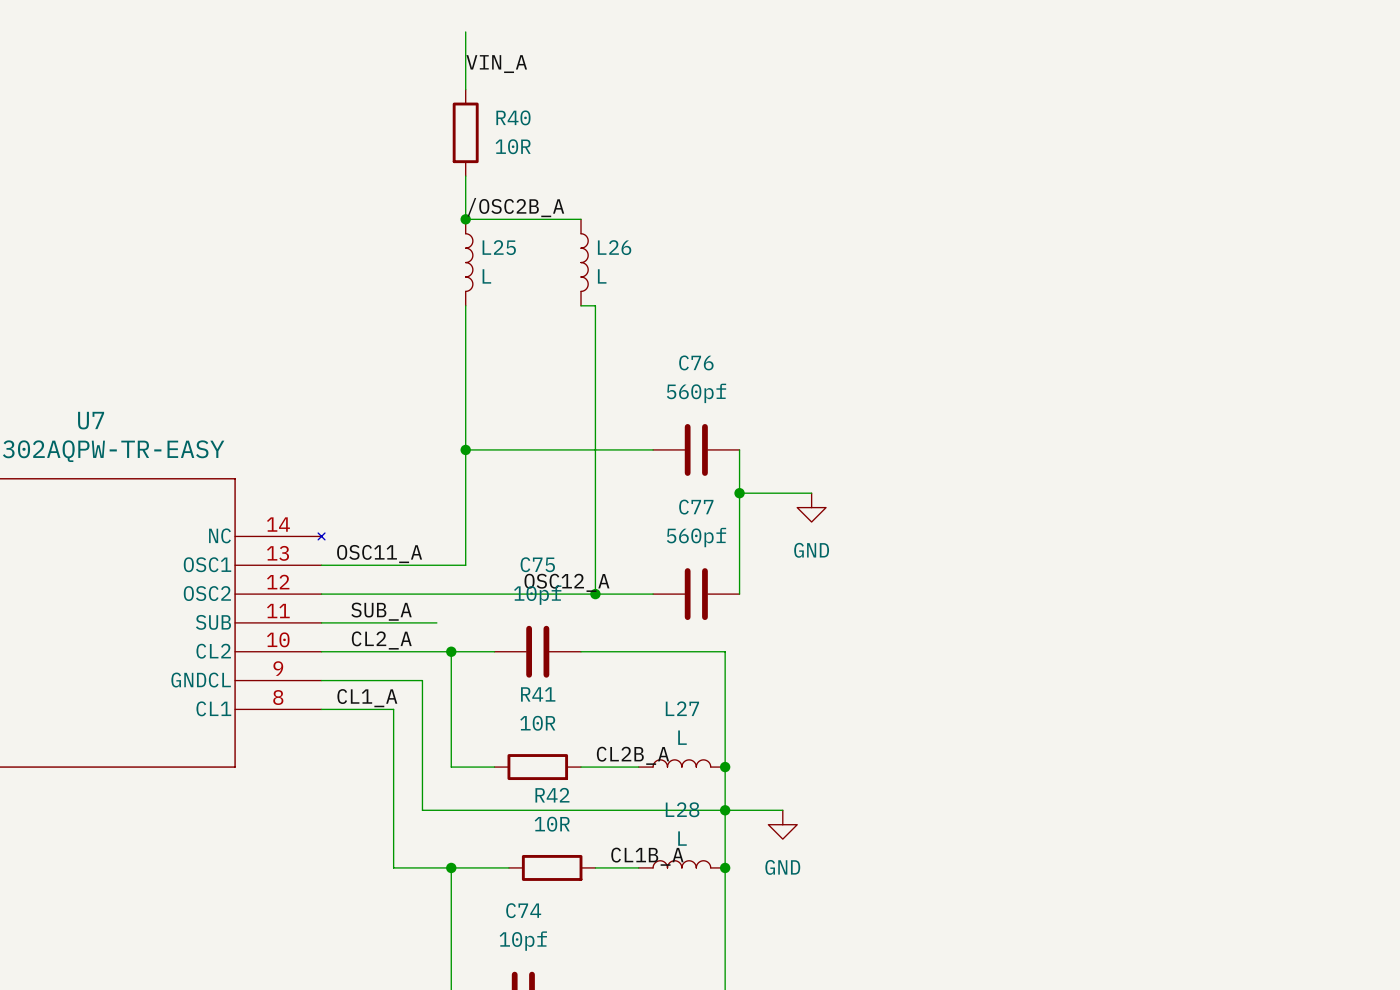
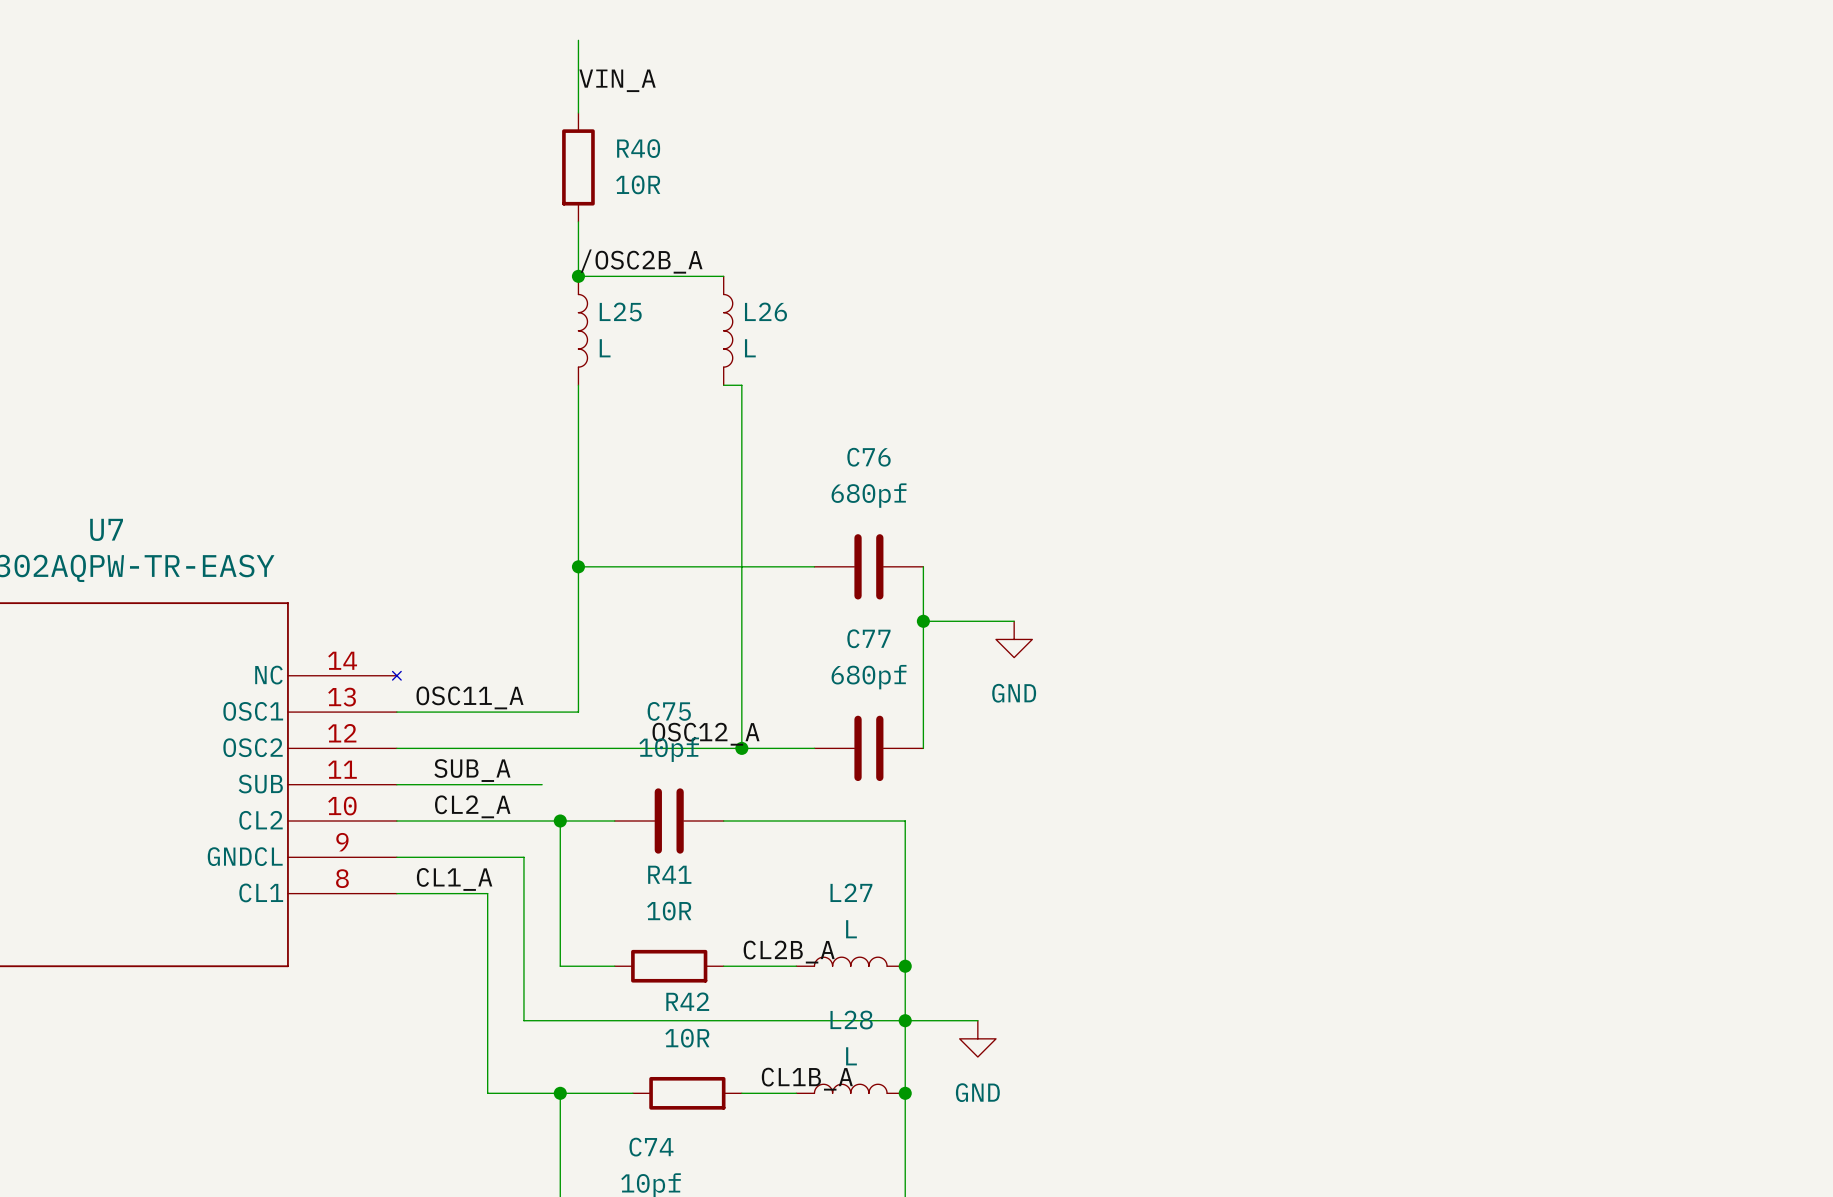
C76 value: 560pf (696, 393) -> 680pf (869, 495)
C77 value: 560pf (696, 537) -> 680pf (869, 677)

